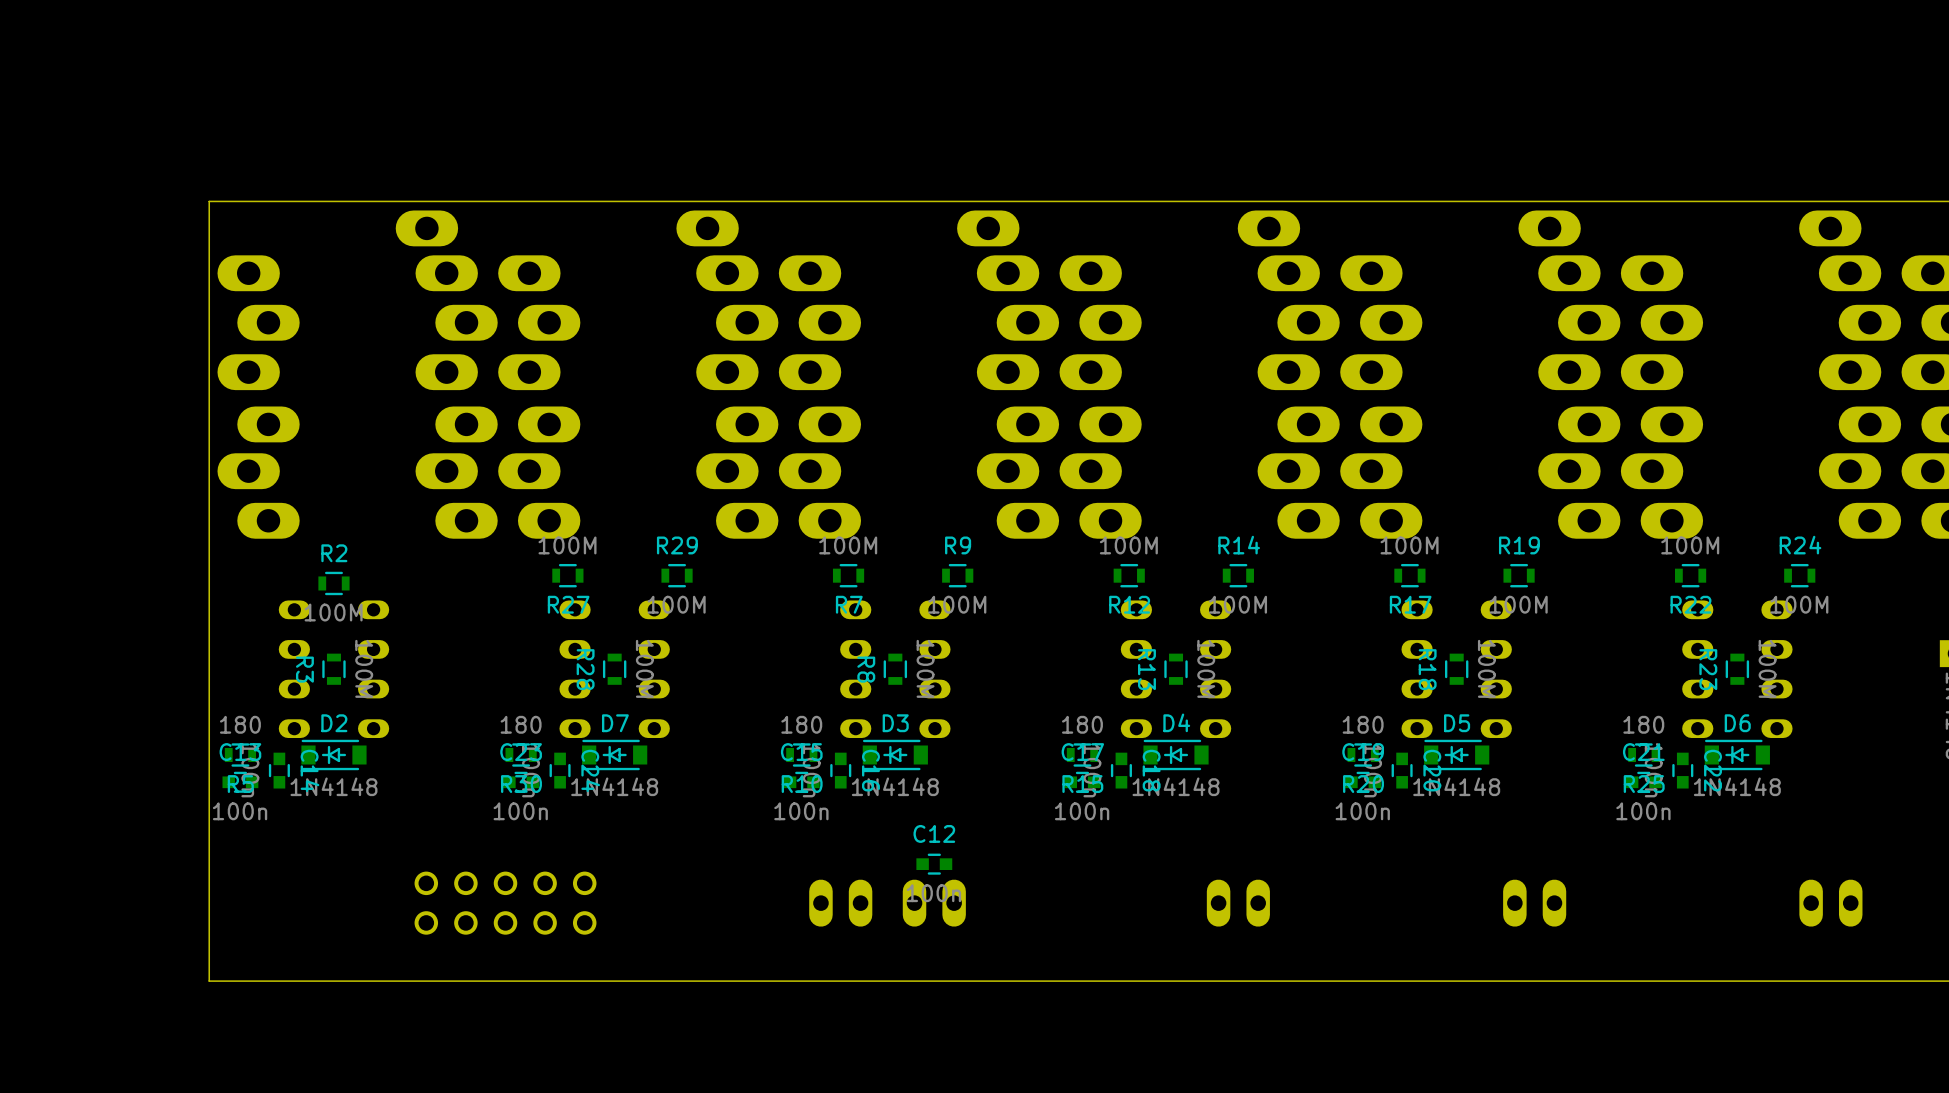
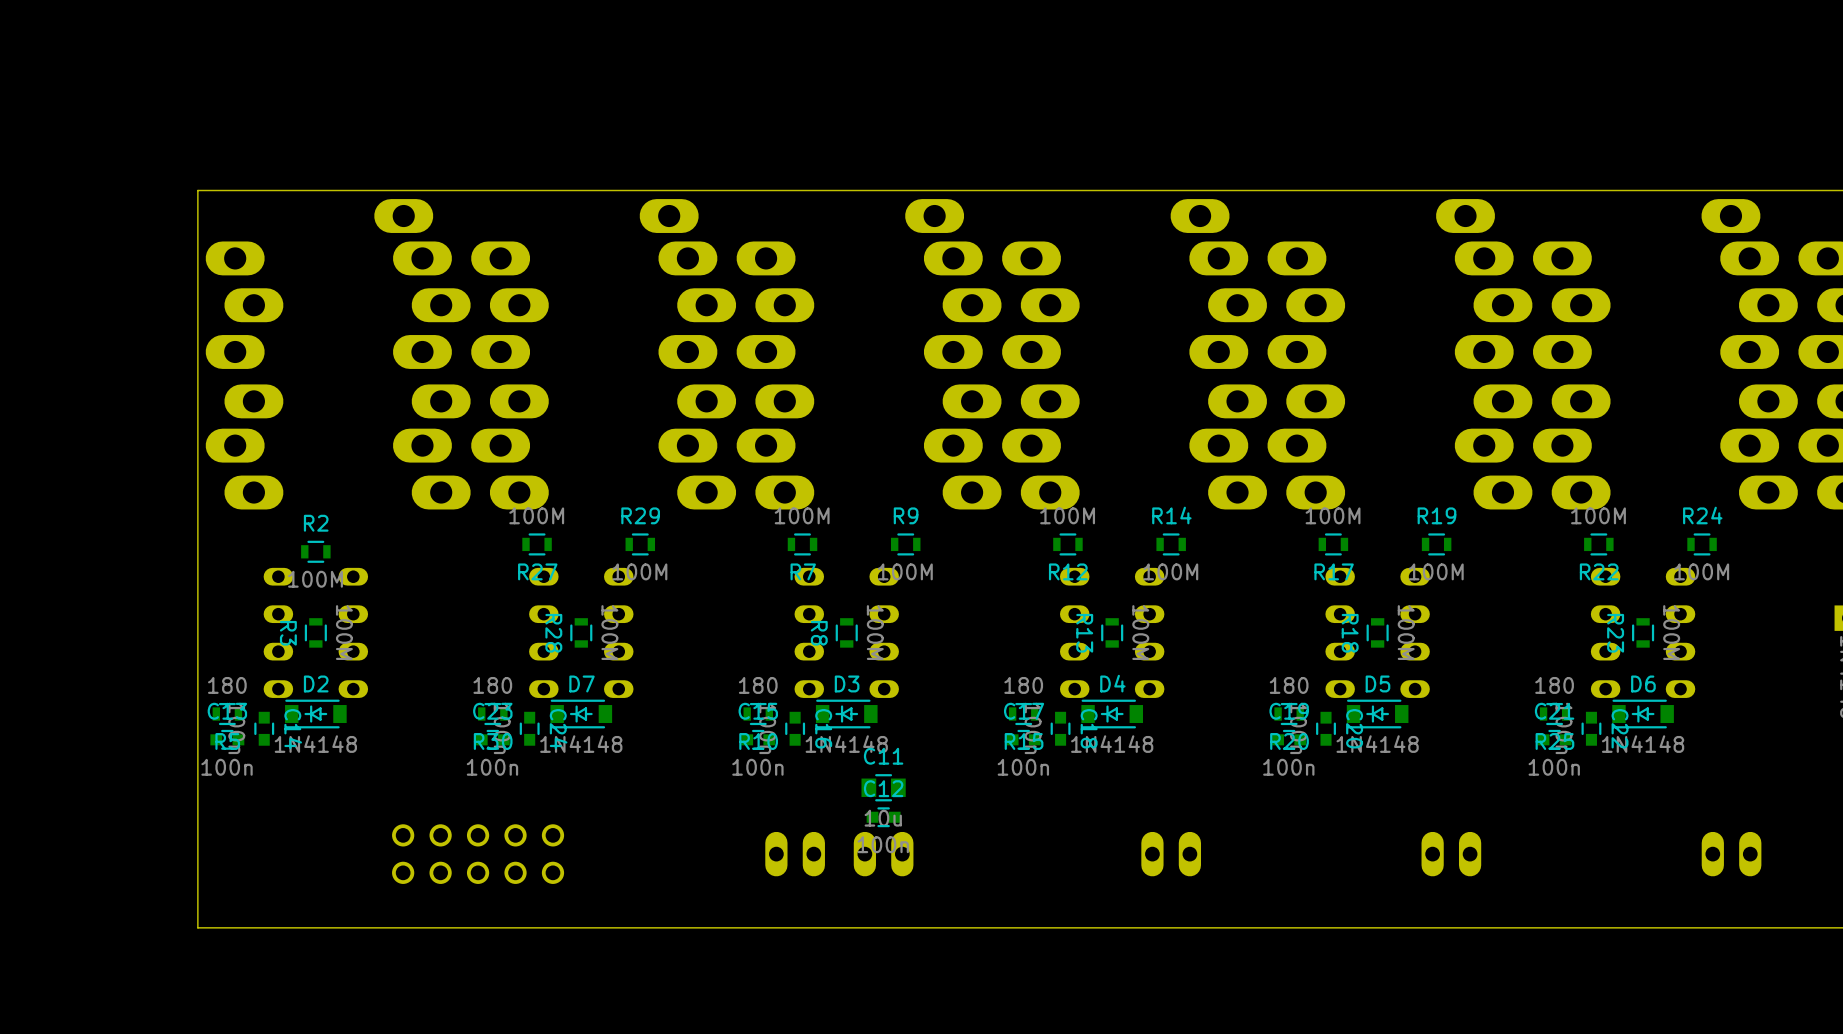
C11: none -> 10u (883, 787)

